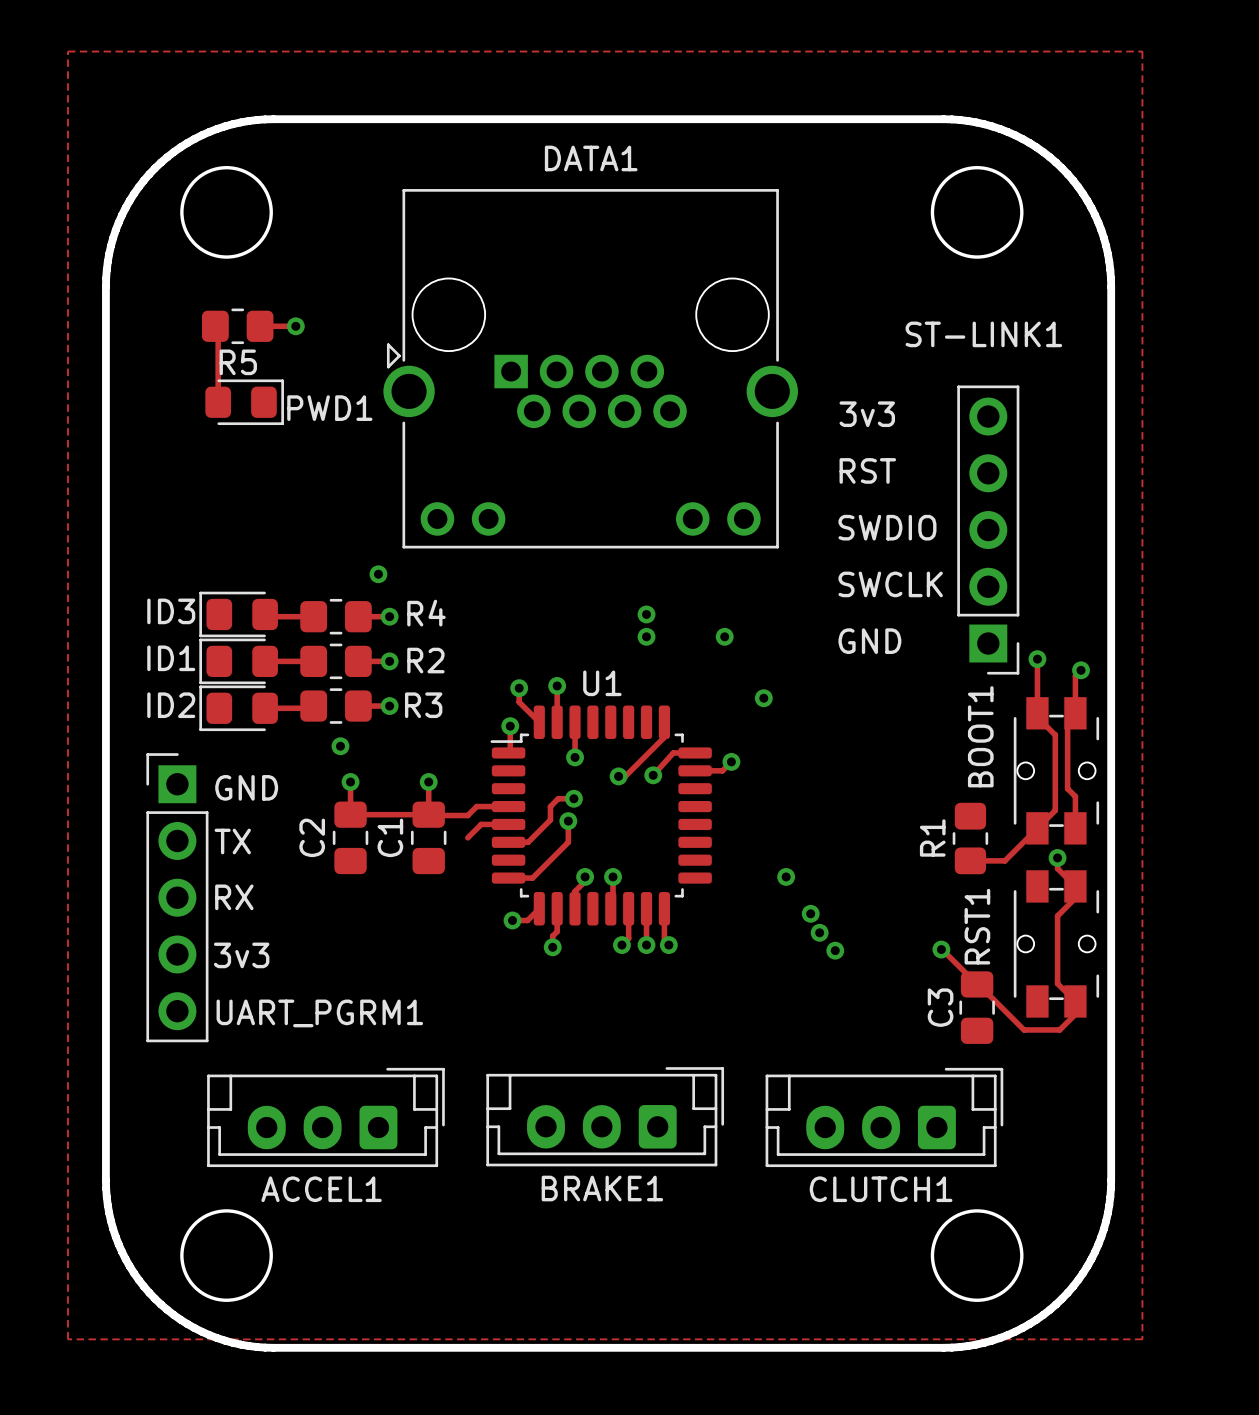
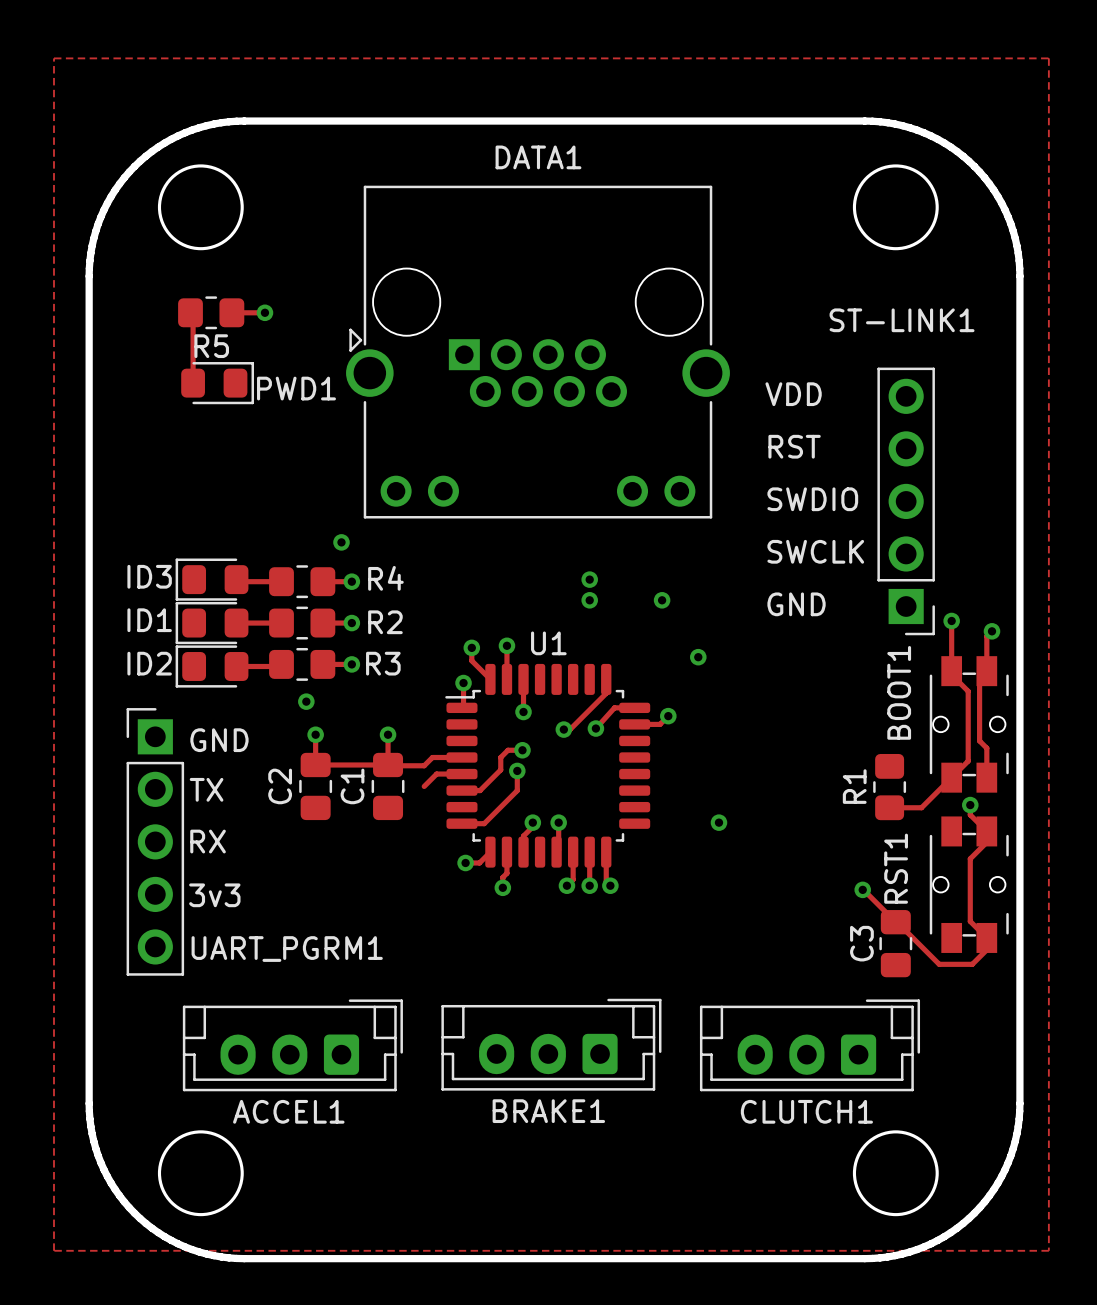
text: 3v3 (867, 414) -> VDD (793, 394)
via: (810, 913) -> none
via: (819, 932) -> none
via: (835, 950) -> none

